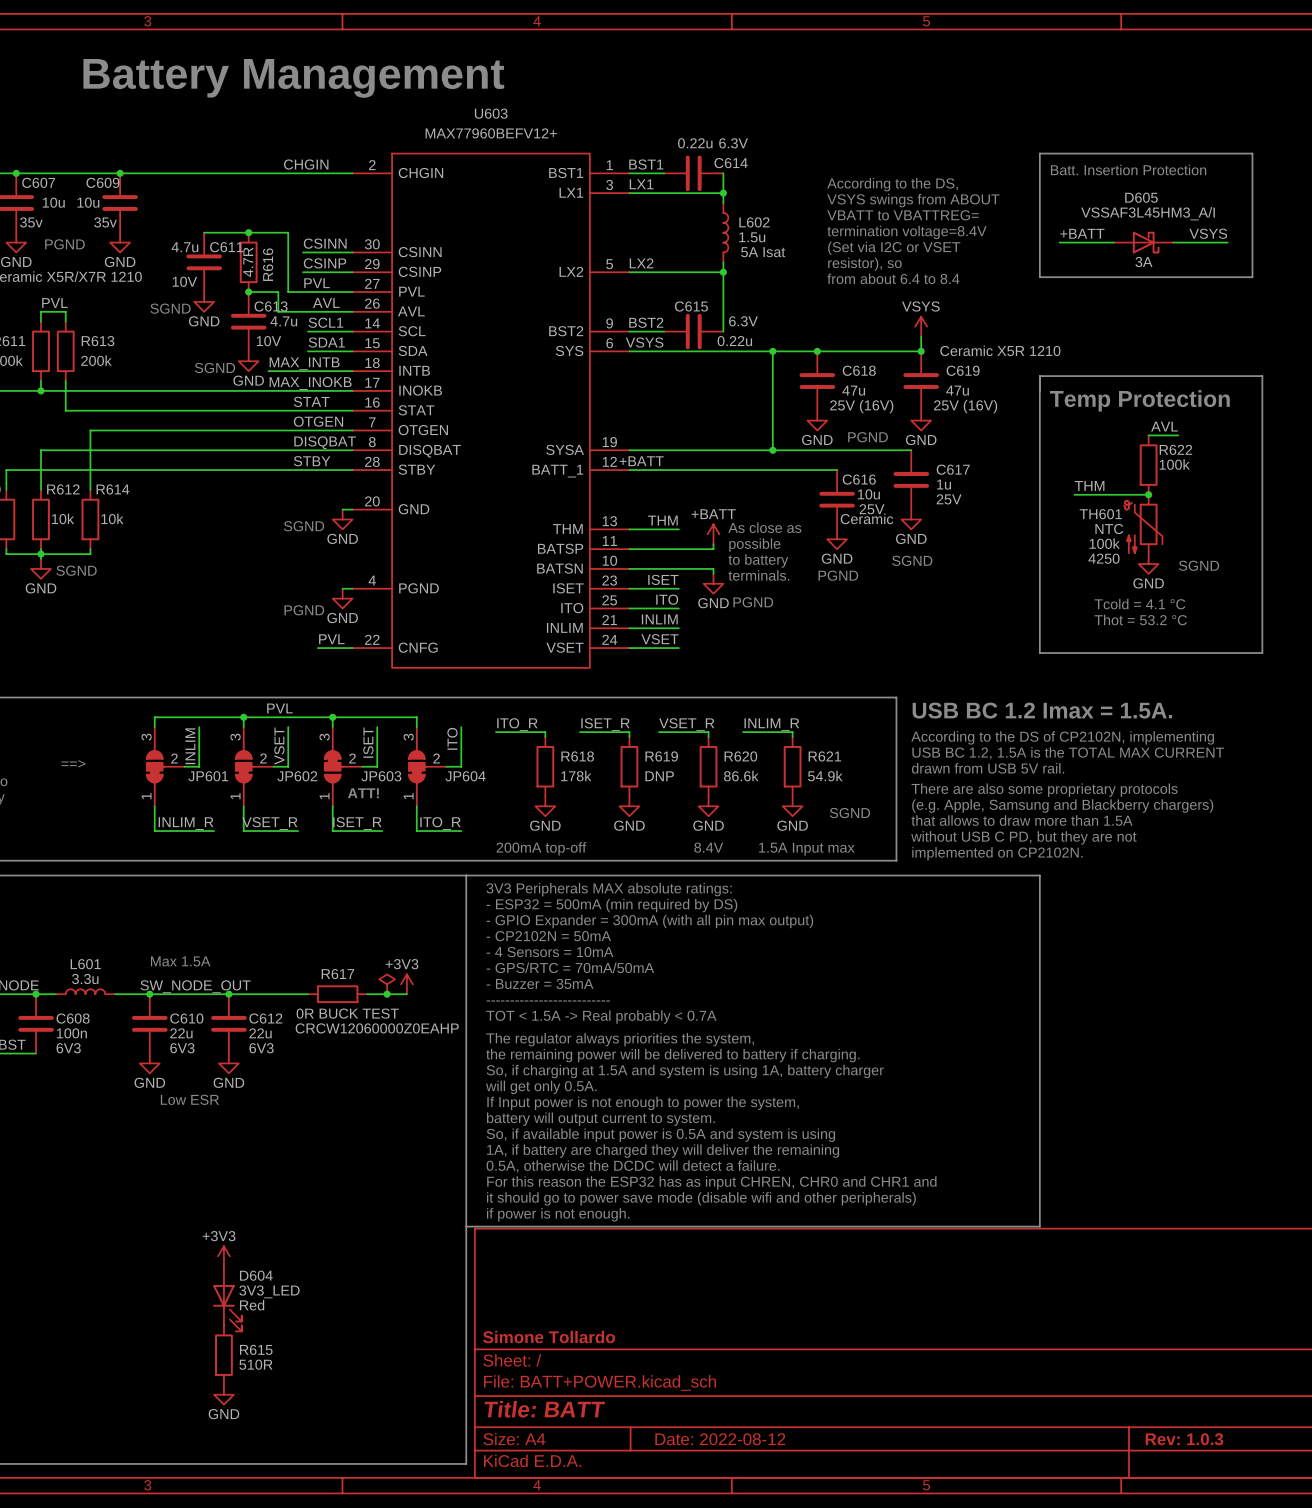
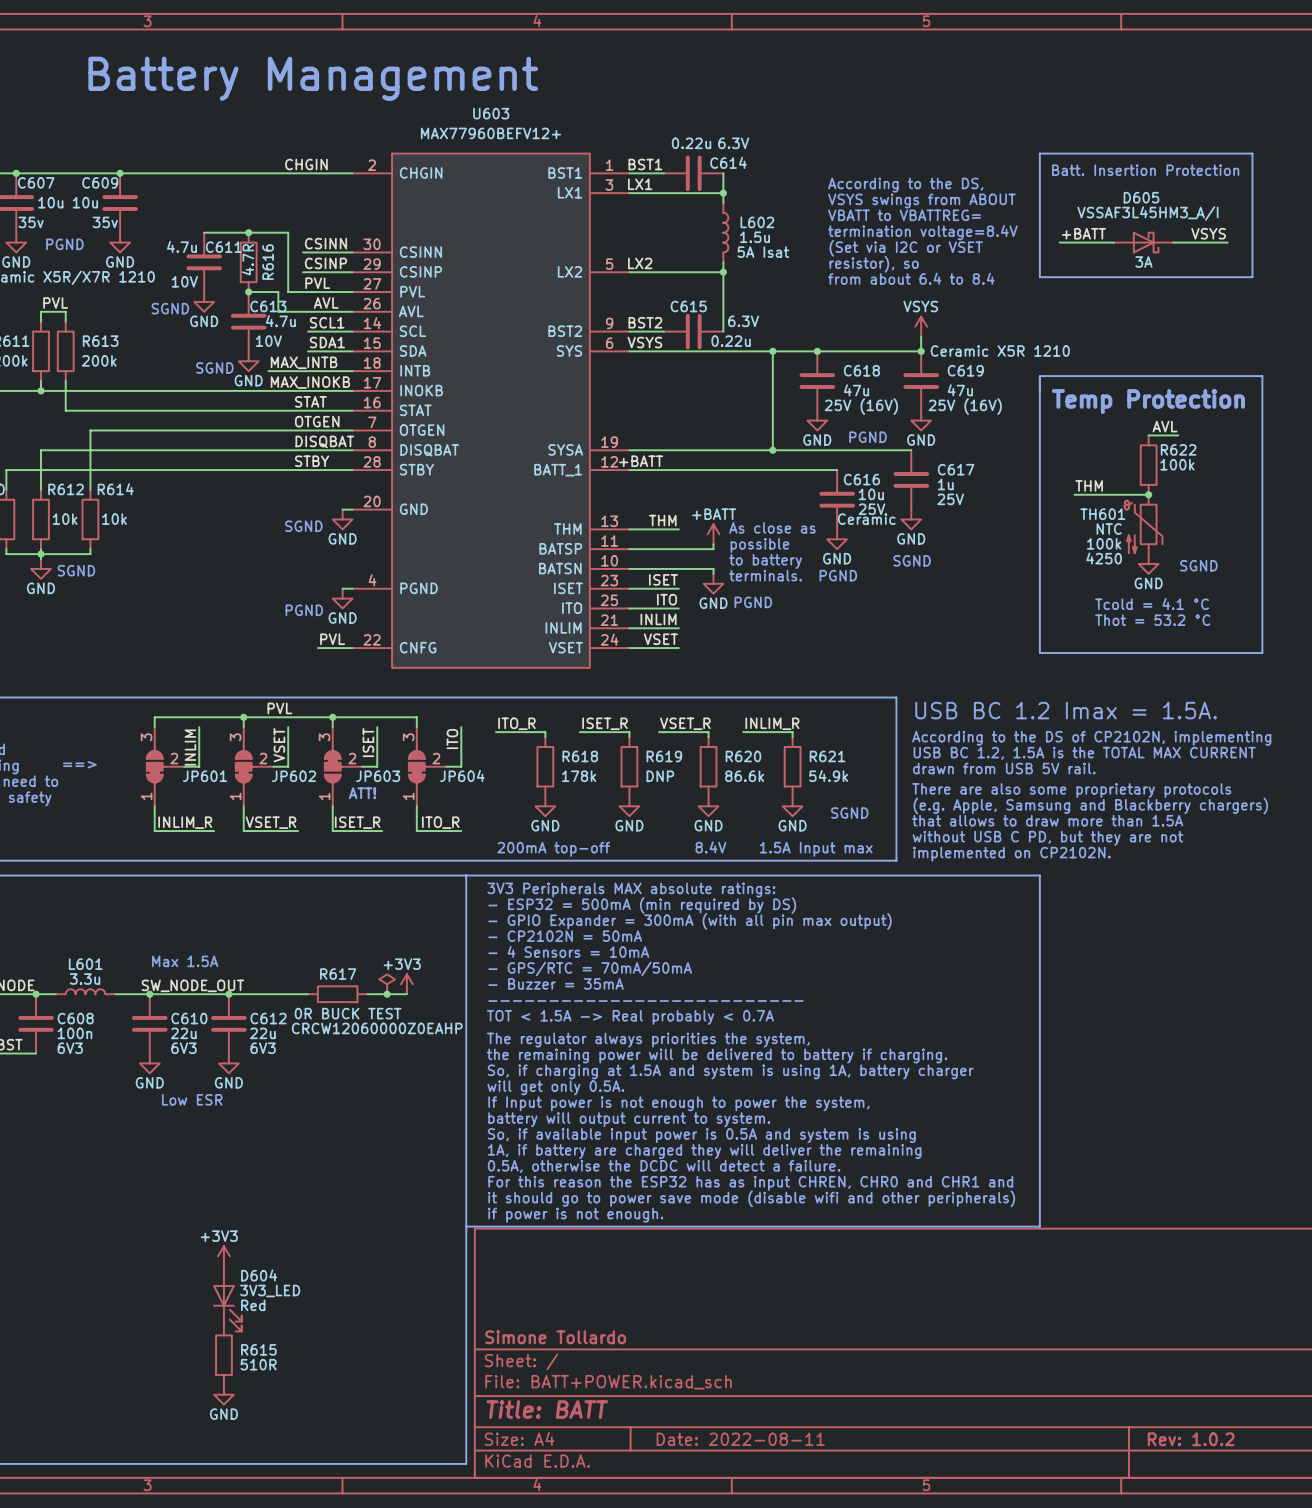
title block: Date: 2022-08-12 (720, 1439) -> Date: 2022-08-11 (740, 1439)
title block: Rev: 1.0.3 (1184, 1439) -> Rev: 1.0.2 (1191, 1439)

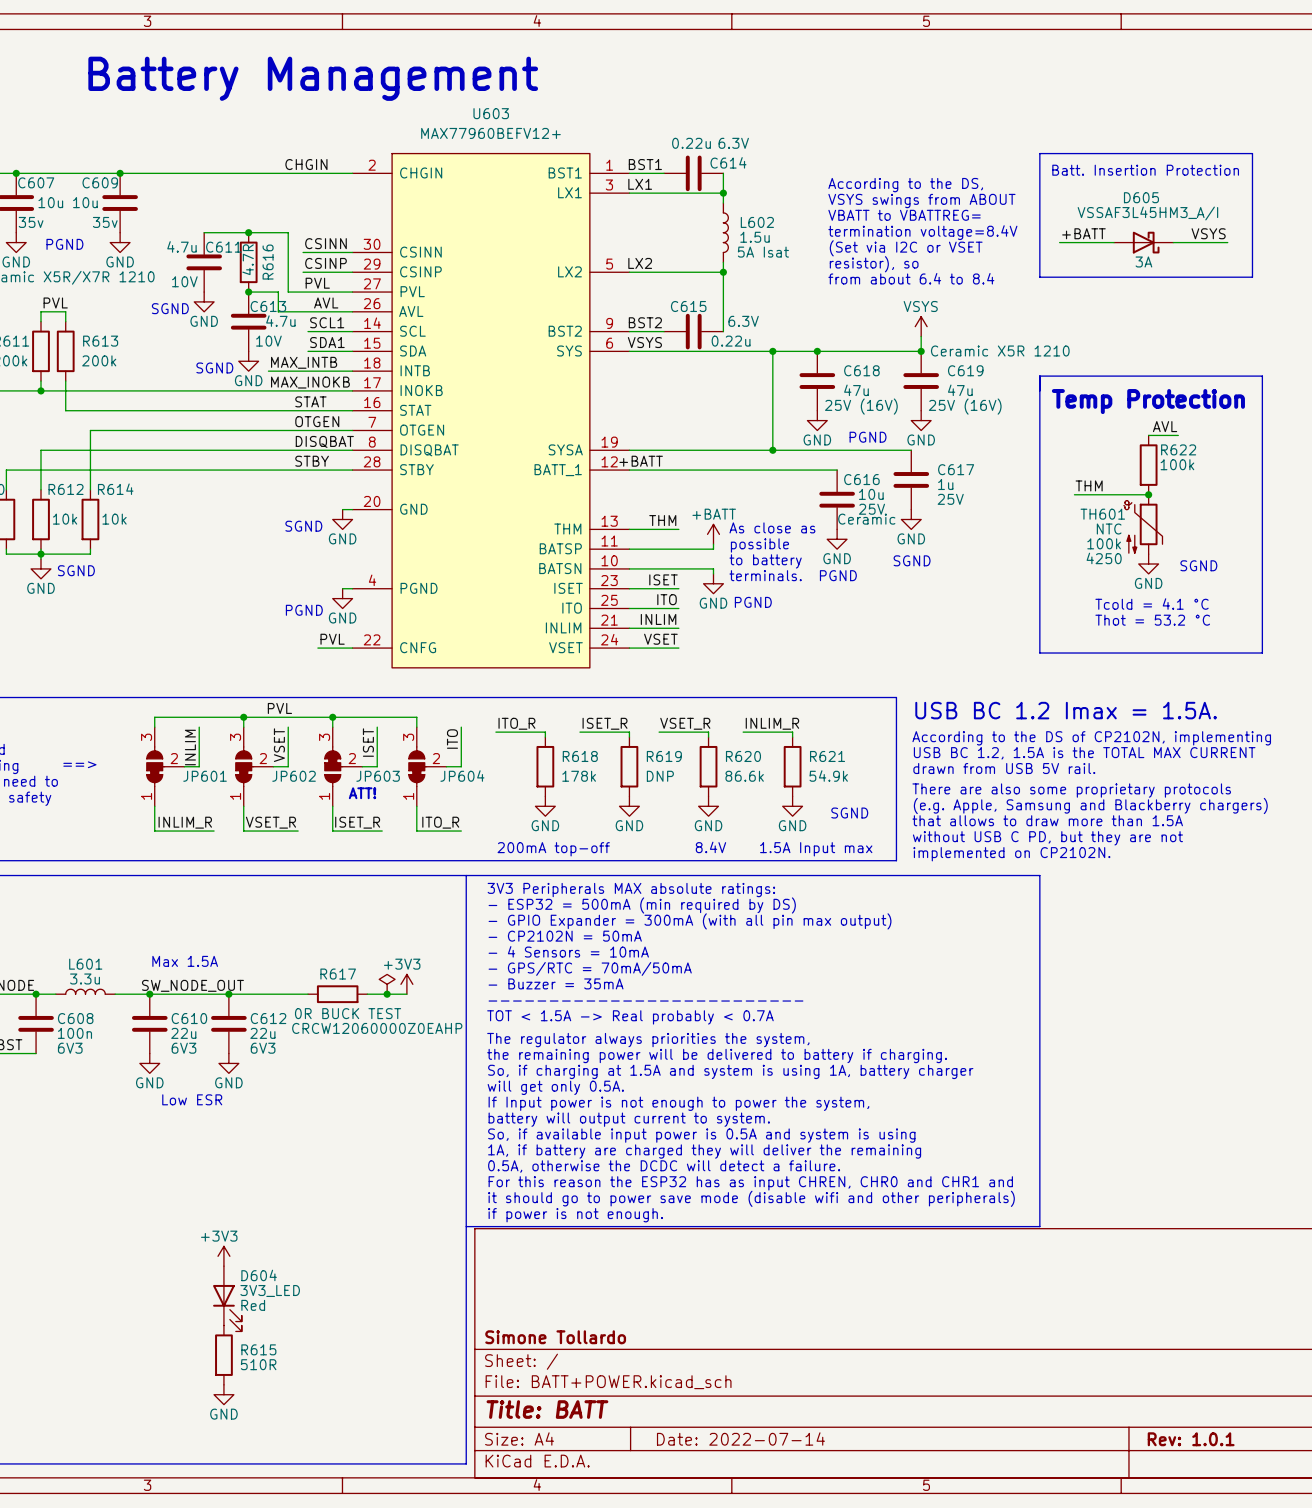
title block: Date: 2022-08-11 (740, 1439) -> Date: 2022-07-14 (740, 1438)
title block: Rev: 1.0.2 (1191, 1439) -> Rev: 1.0.1 (1191, 1439)

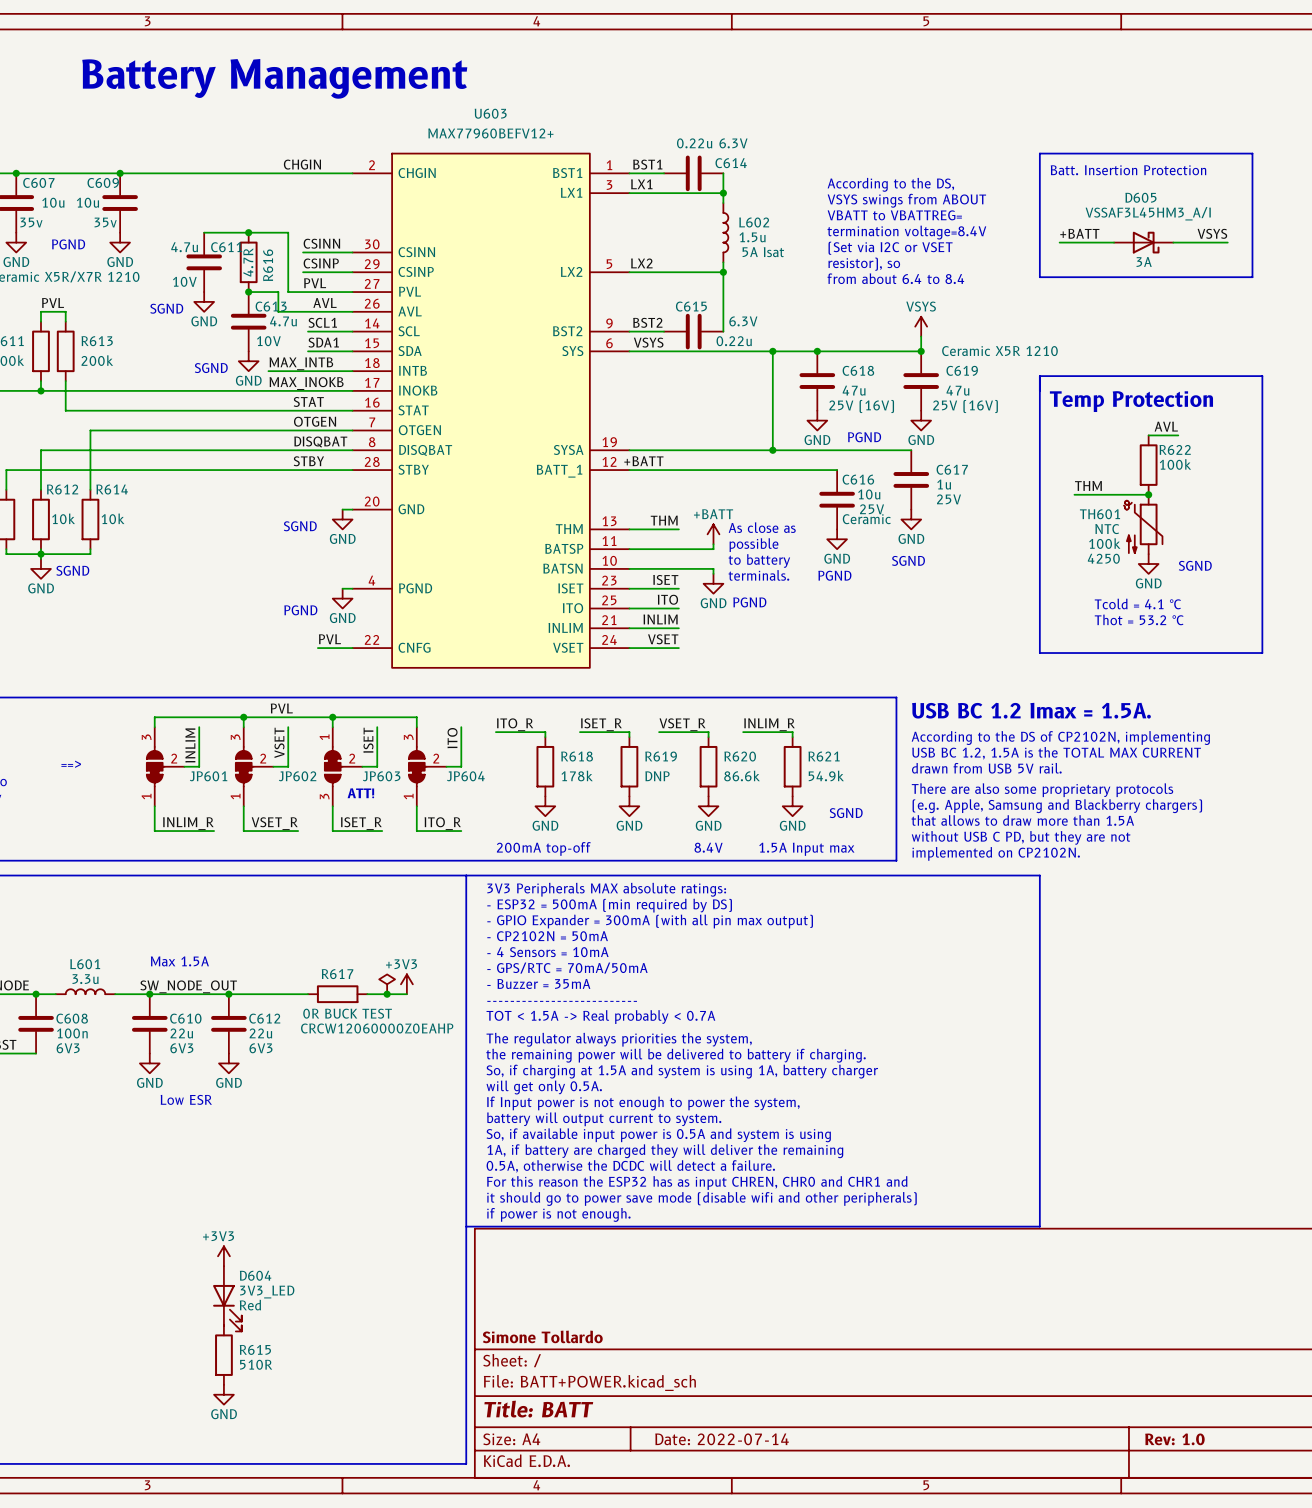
JP603 pin number: 3 (324, 737) -> 1 (324, 737)
JP603 pin number: 1 (324, 796) -> 3 (324, 796)
title block: Rev: 1.0.1 (1191, 1439) -> Rev: 1.0 (1174, 1439)

